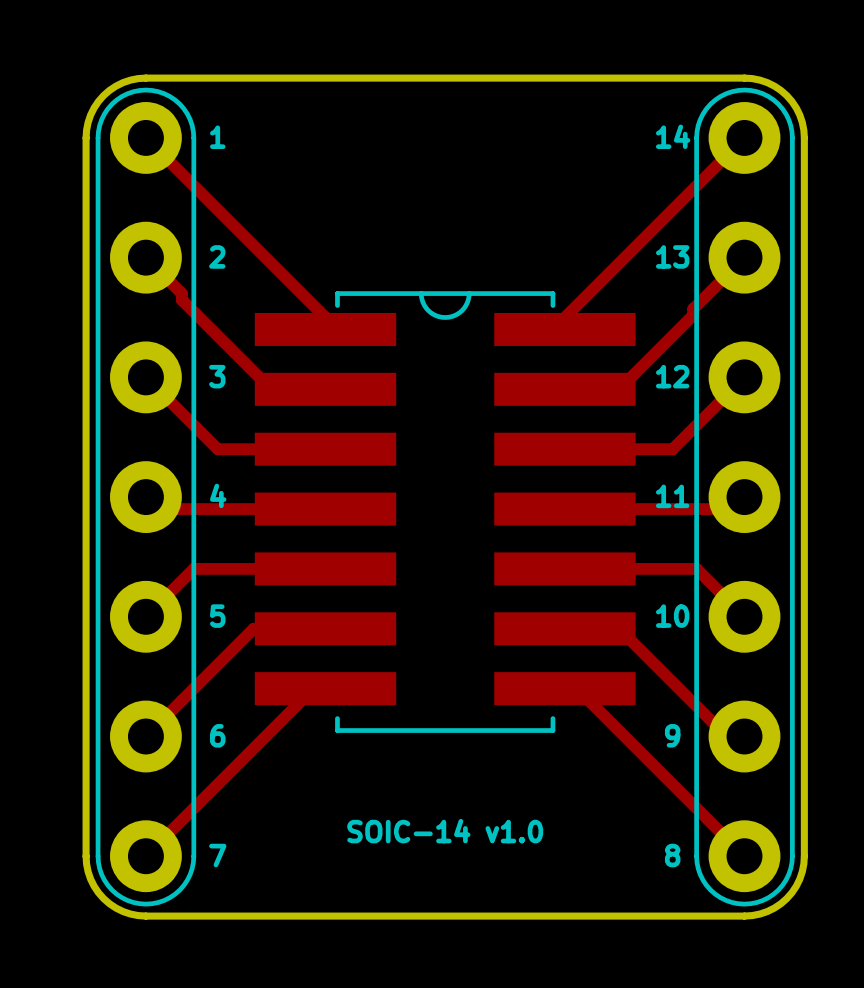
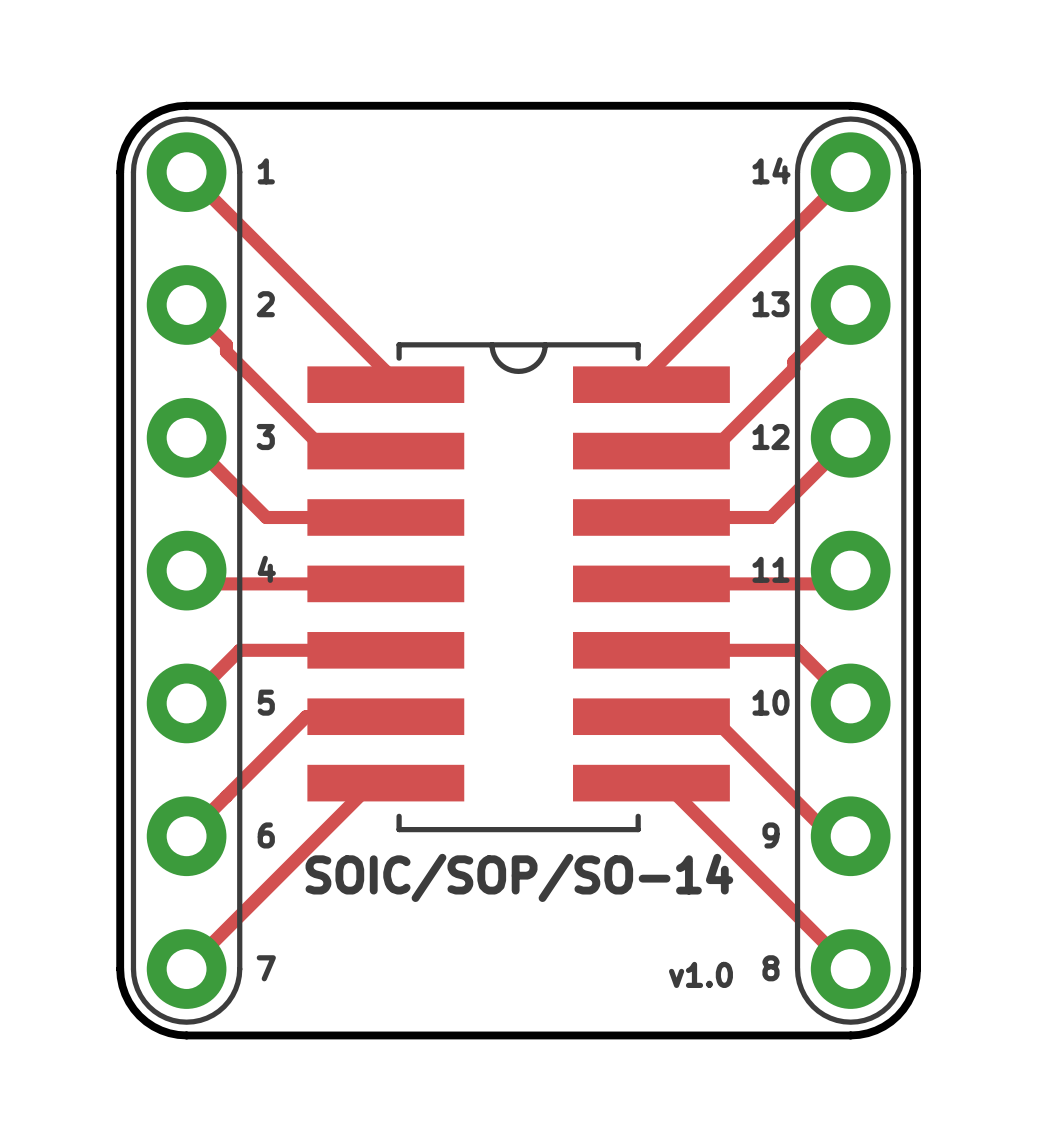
part value: none -> SOIC/SOP/SO-14 (519, 877)
text: SOIC-14 v1.0 (445, 831) -> none
text: none -> v1.0 (700, 974)

